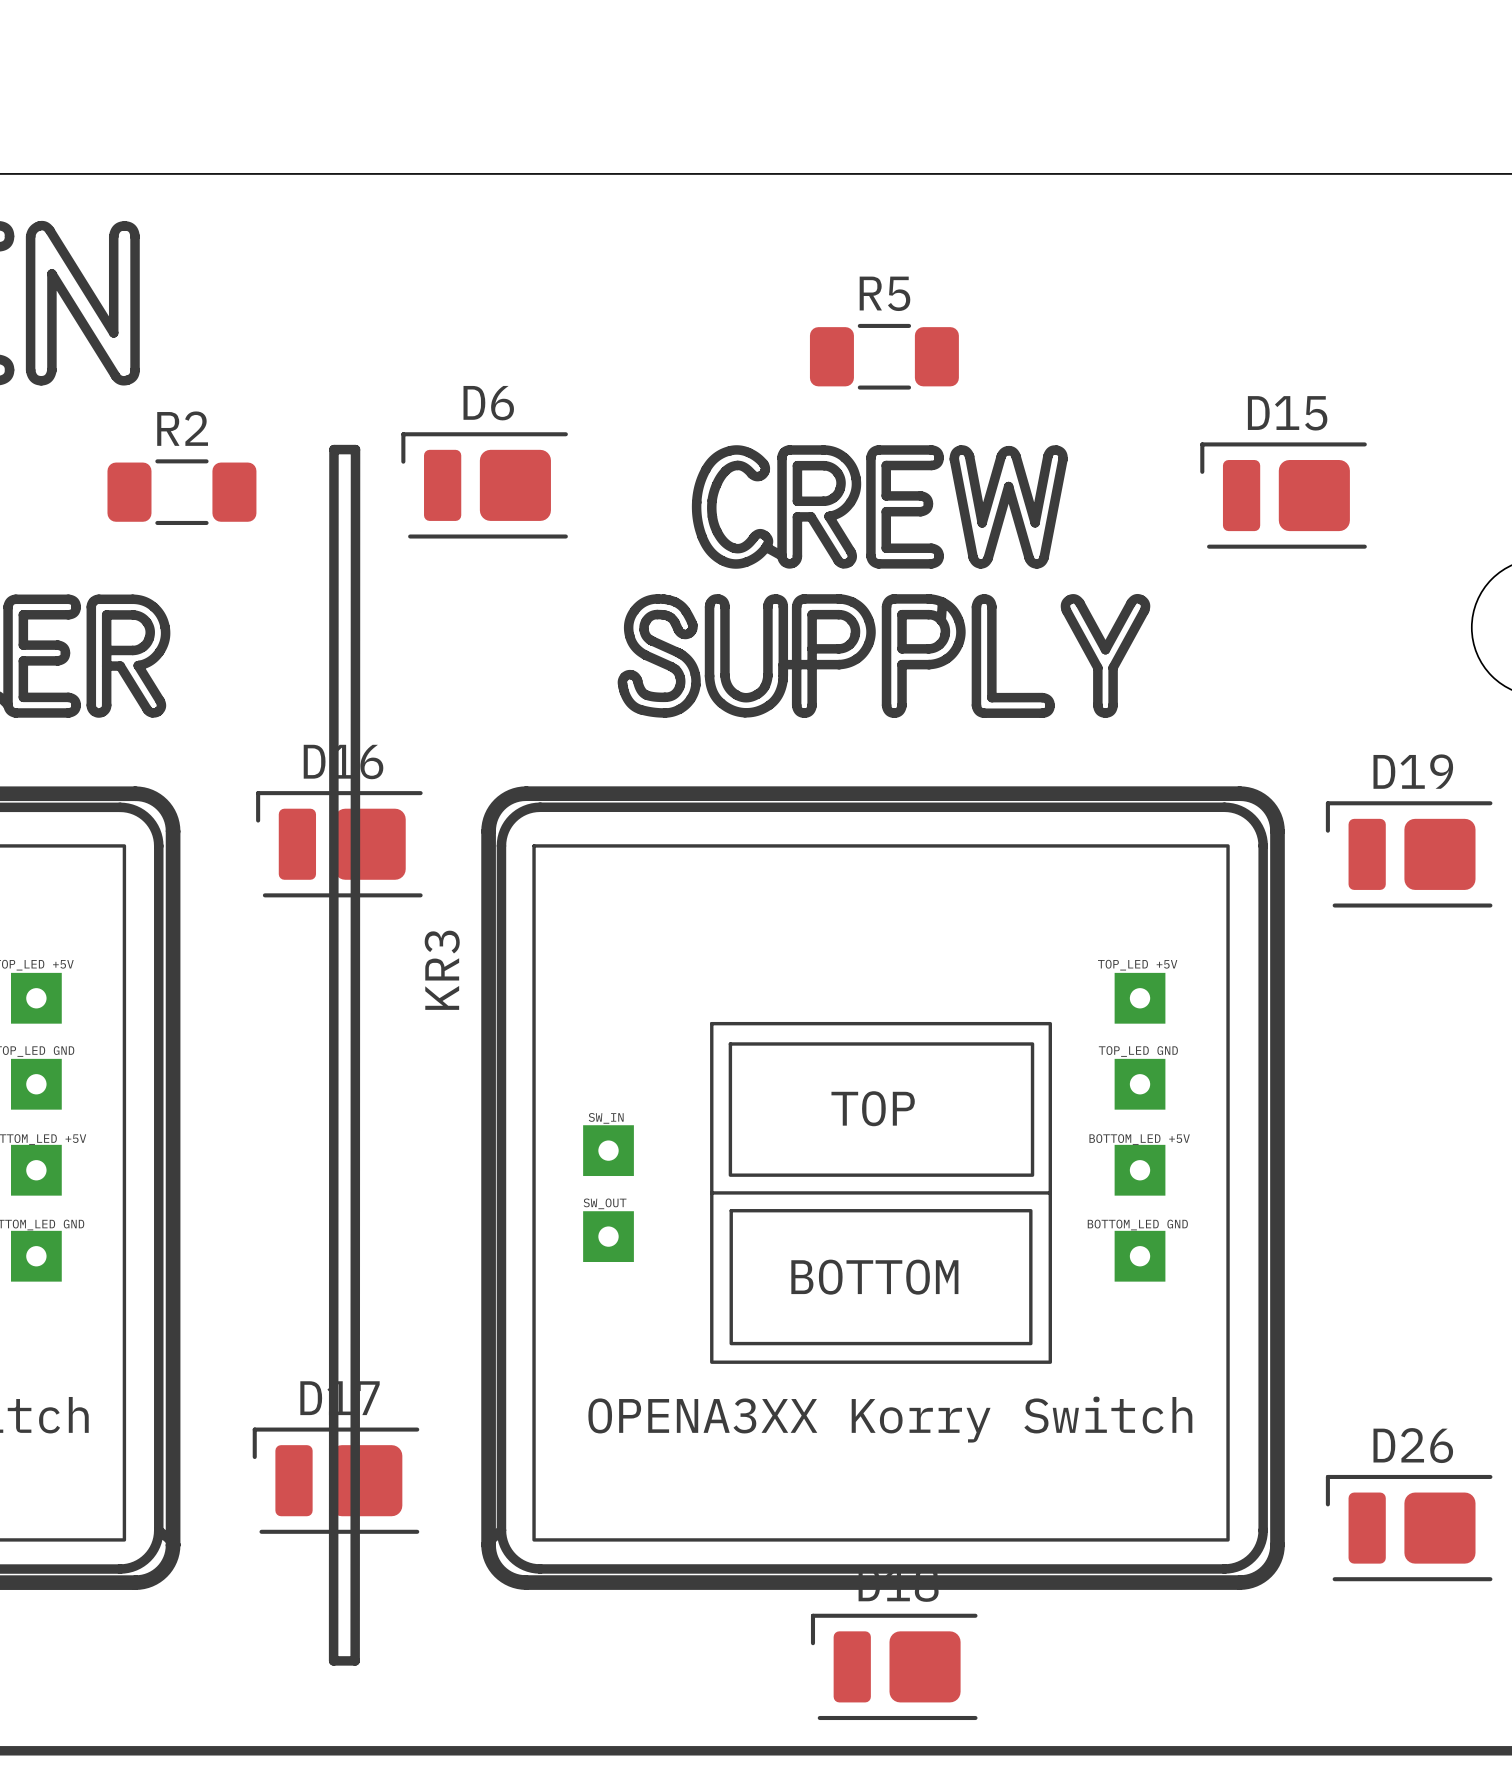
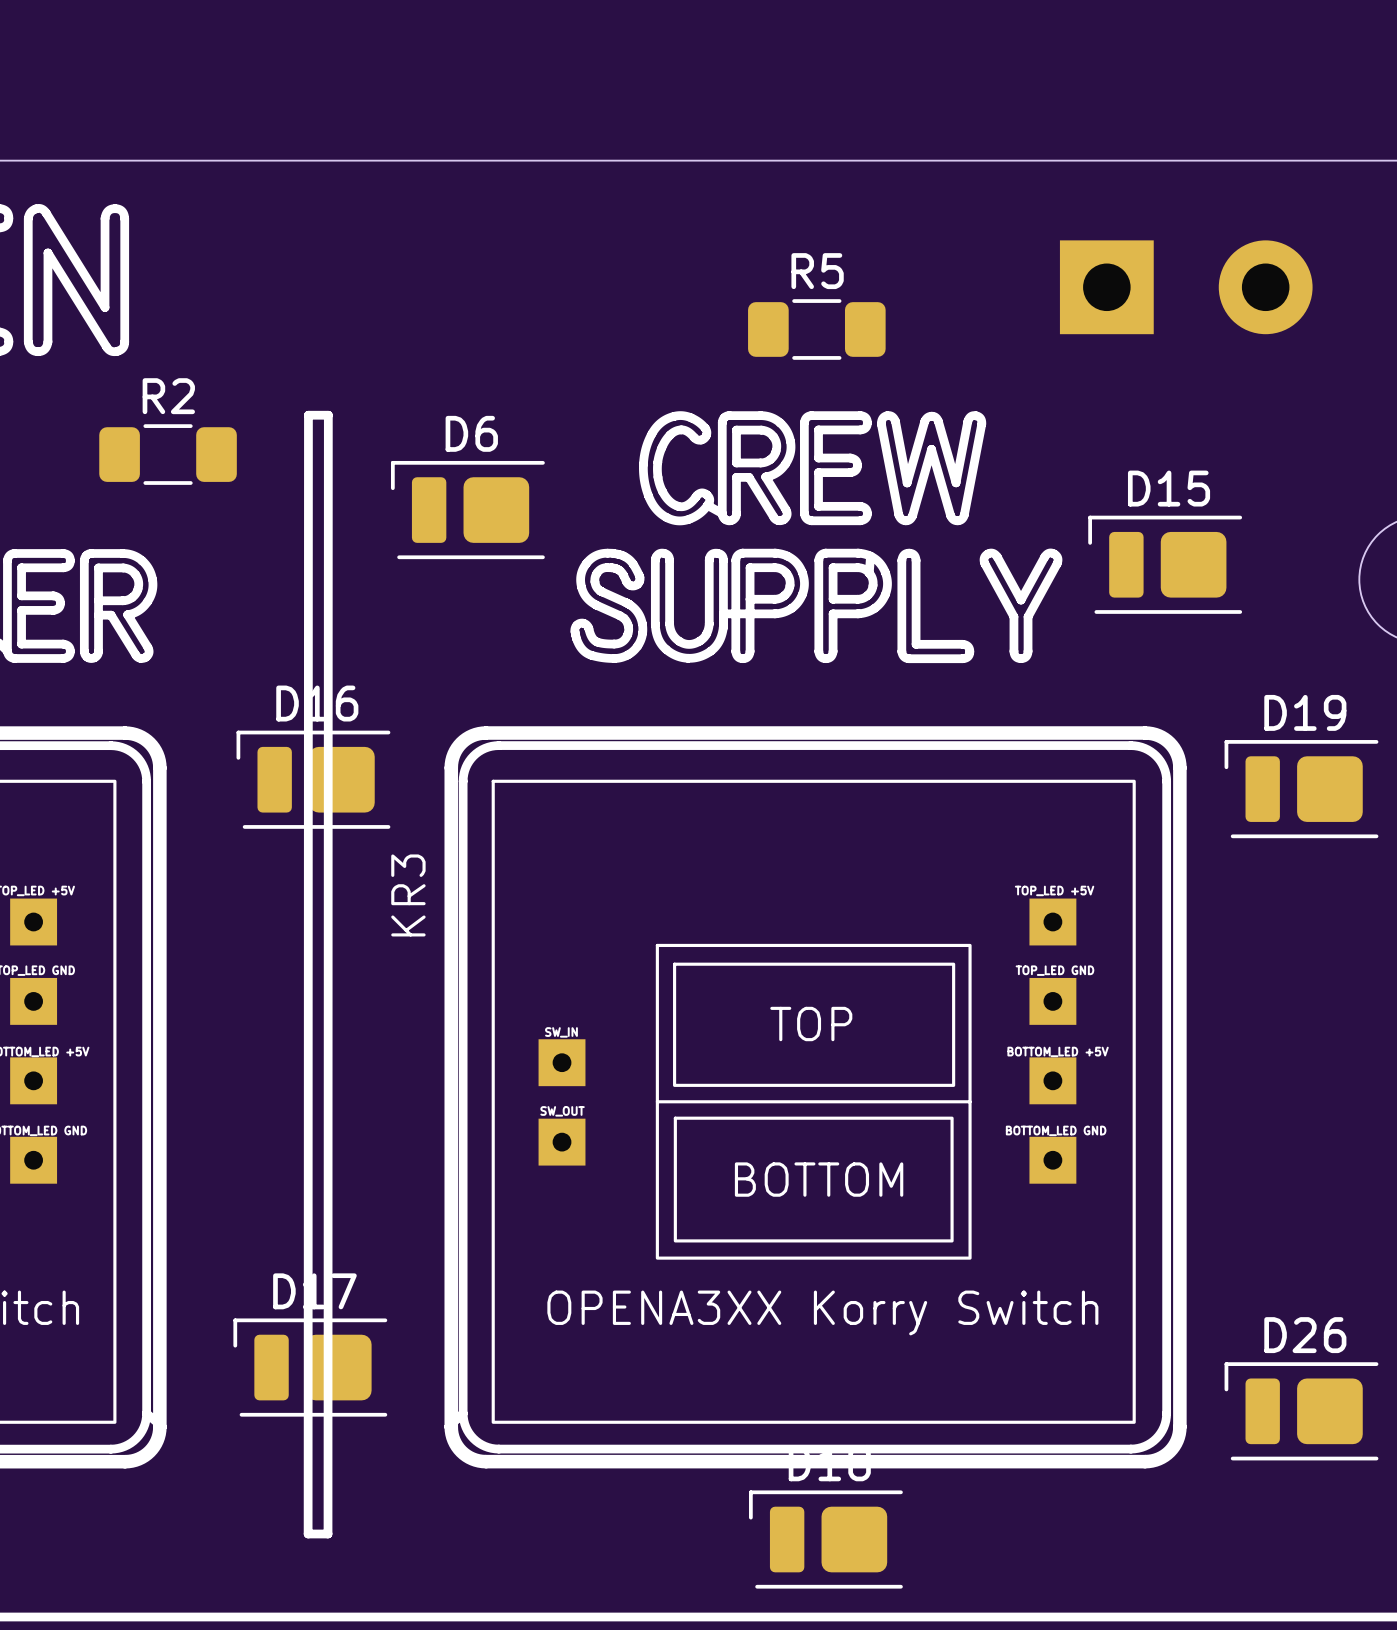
part: none -> (1186, 287)
D6 position: (484, 485) -> (467, 510)
D15 position: (1283, 495) -> (1165, 564)

